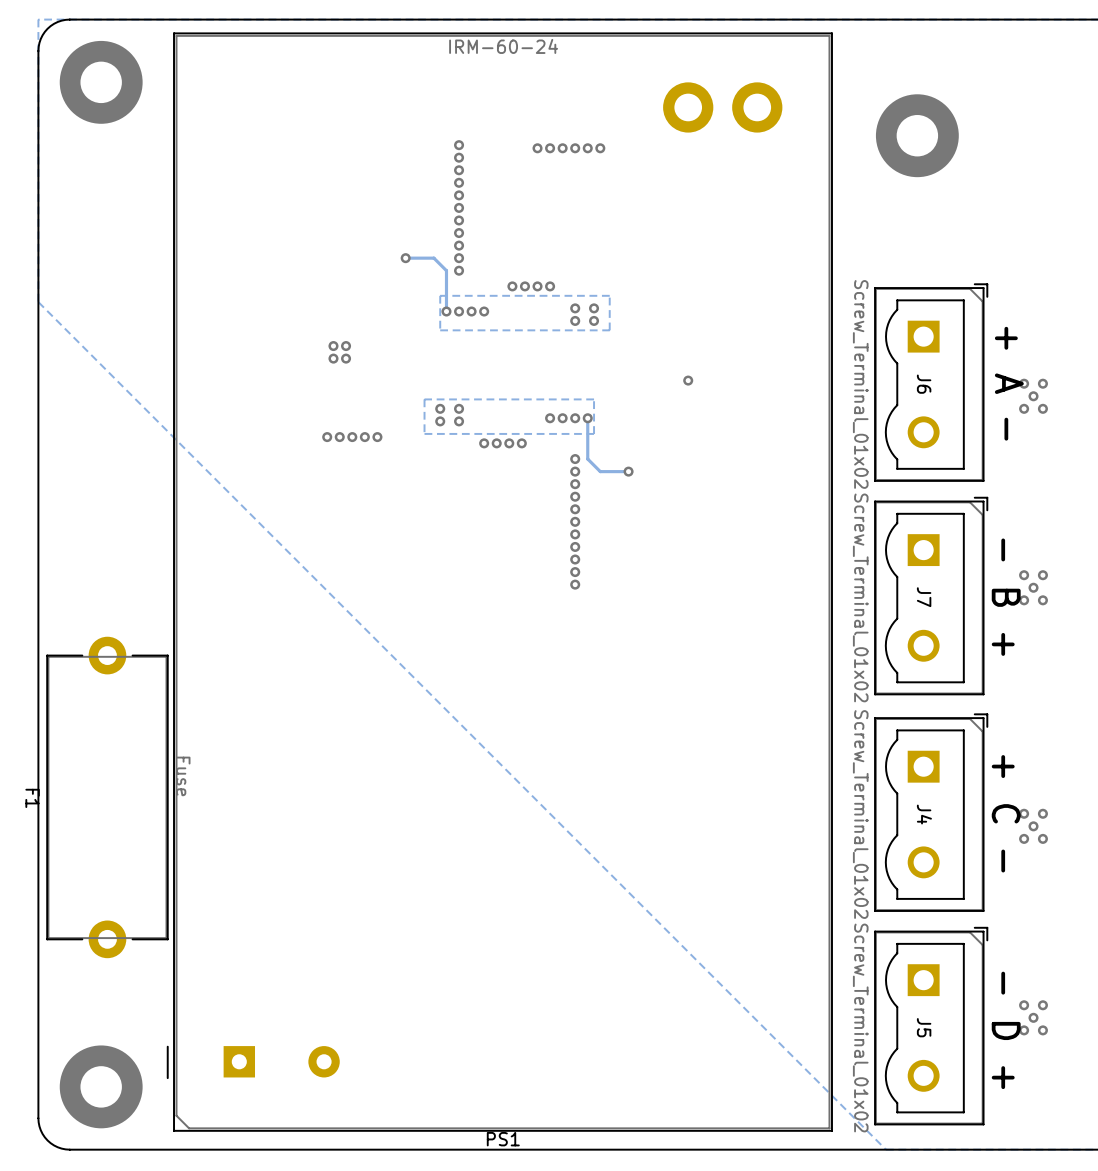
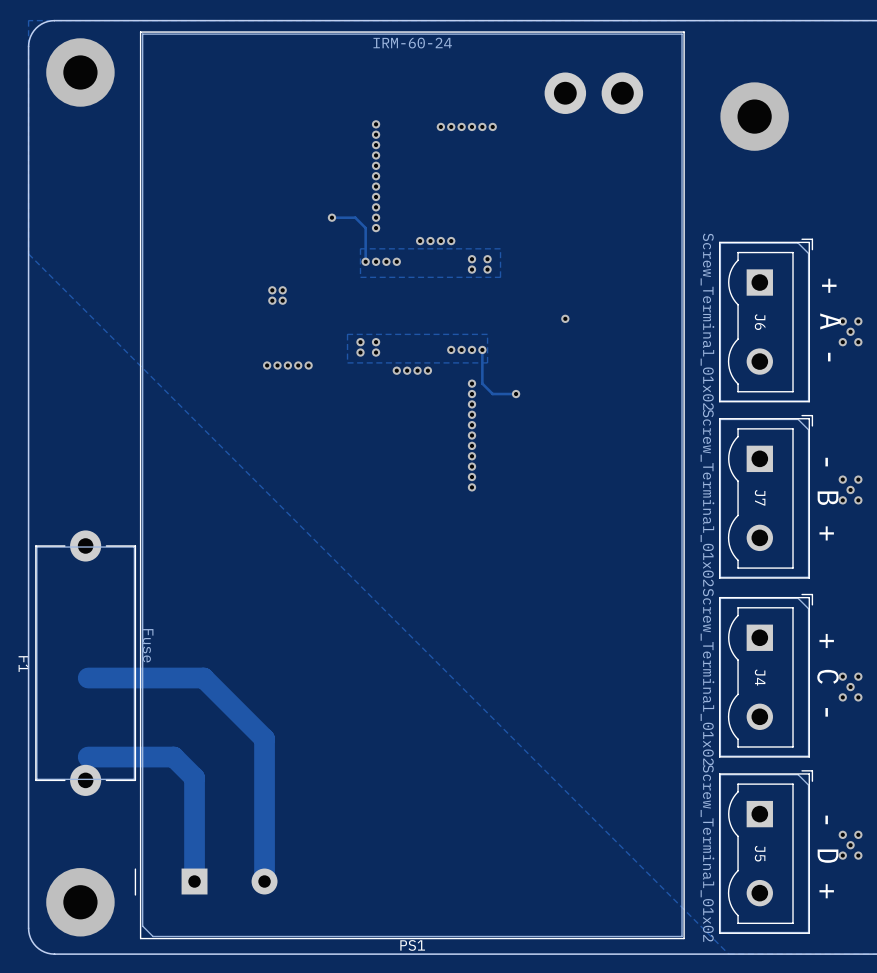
track: none -> (88, 678) (203, 678) (264, 738) (264, 881)
track: none -> (88, 757) (173, 757) (194, 777) (194, 881)

